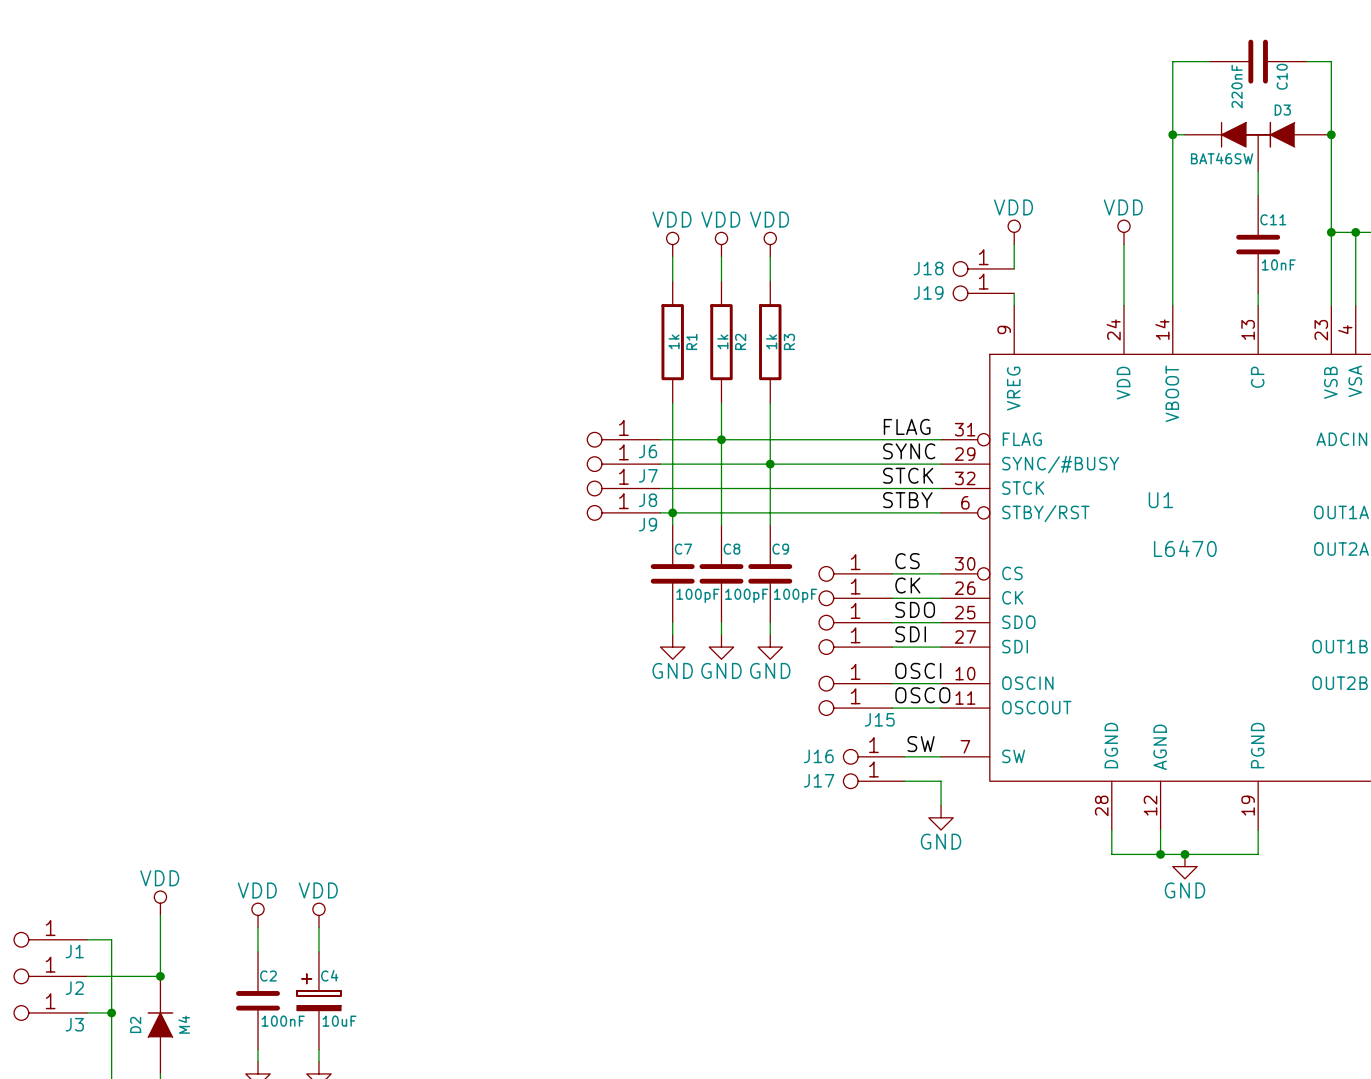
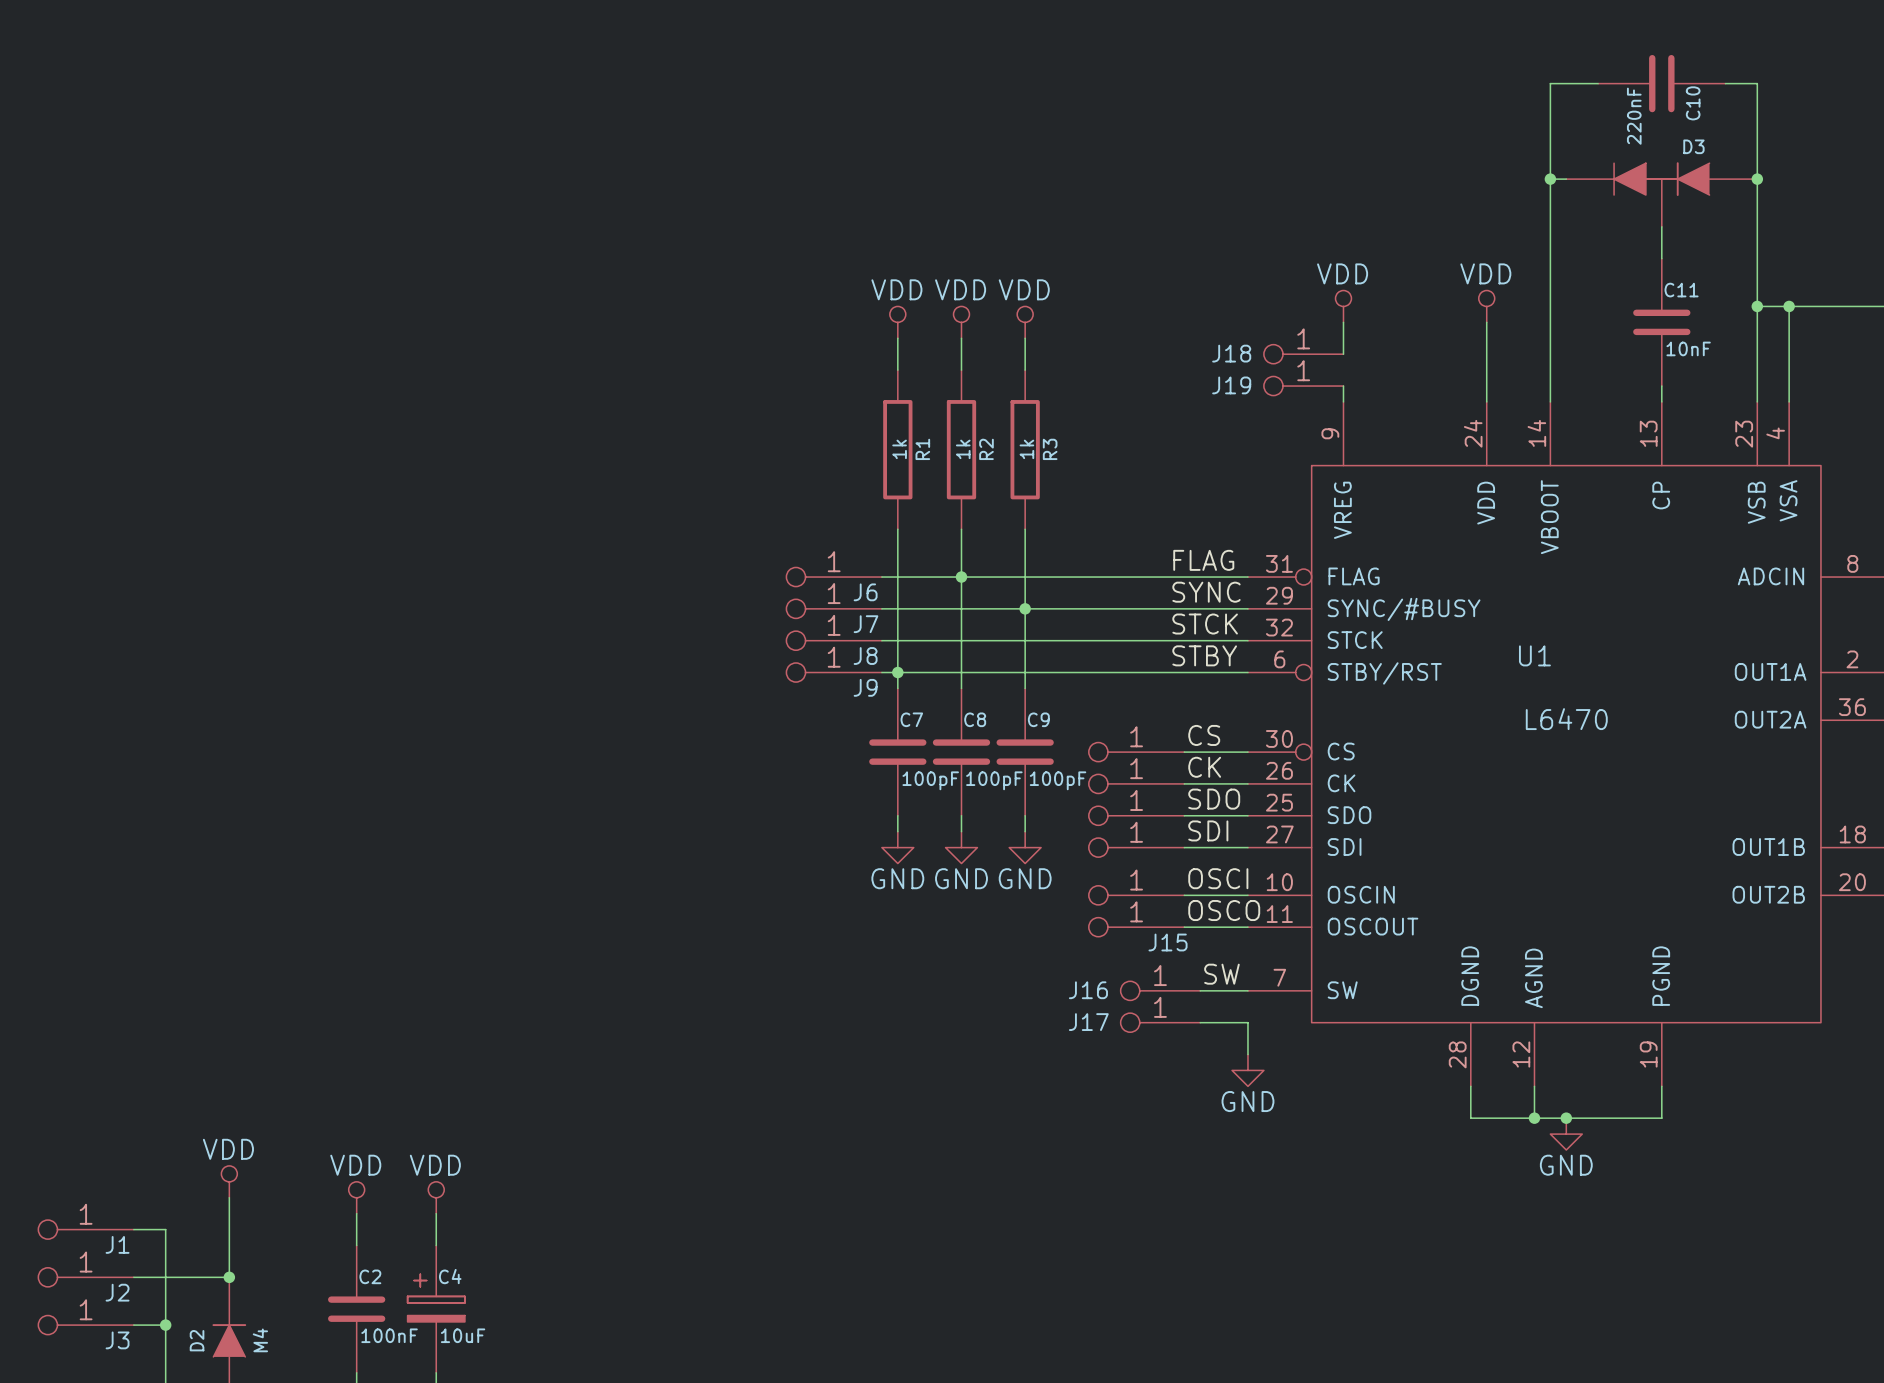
D3 value: BAT46SW (1222, 158) -> none

